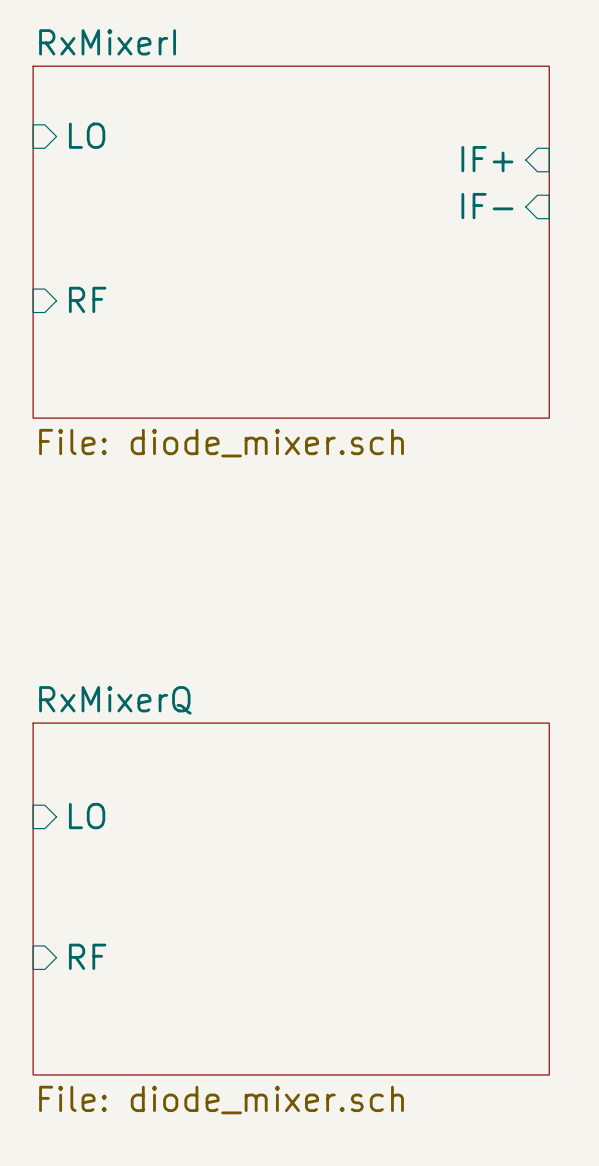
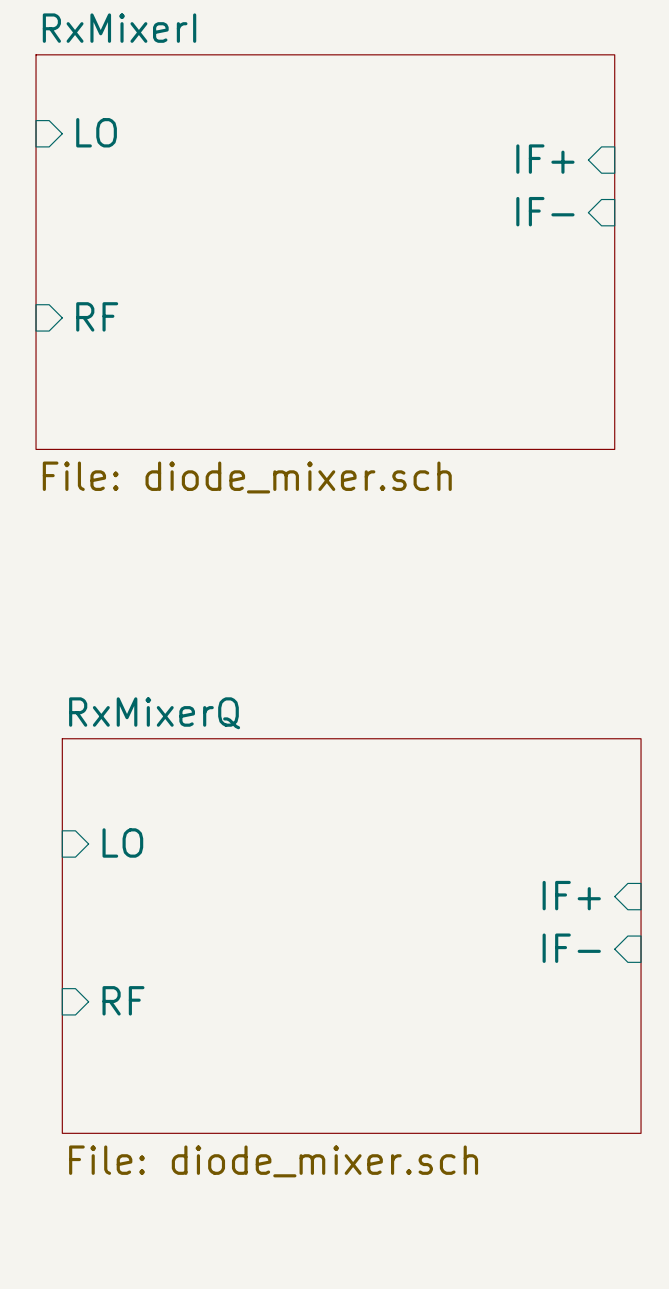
sheet pin position: LO (87, 816) -> LO (122, 842)
sheet pin: none -> IF+ (571, 895)
sheet pin: none -> IF- (571, 948)
sheet RxMixerQ position: (291, 899) -> (351, 936)
sheet pin position: RF (87, 956) -> RF (123, 1000)

